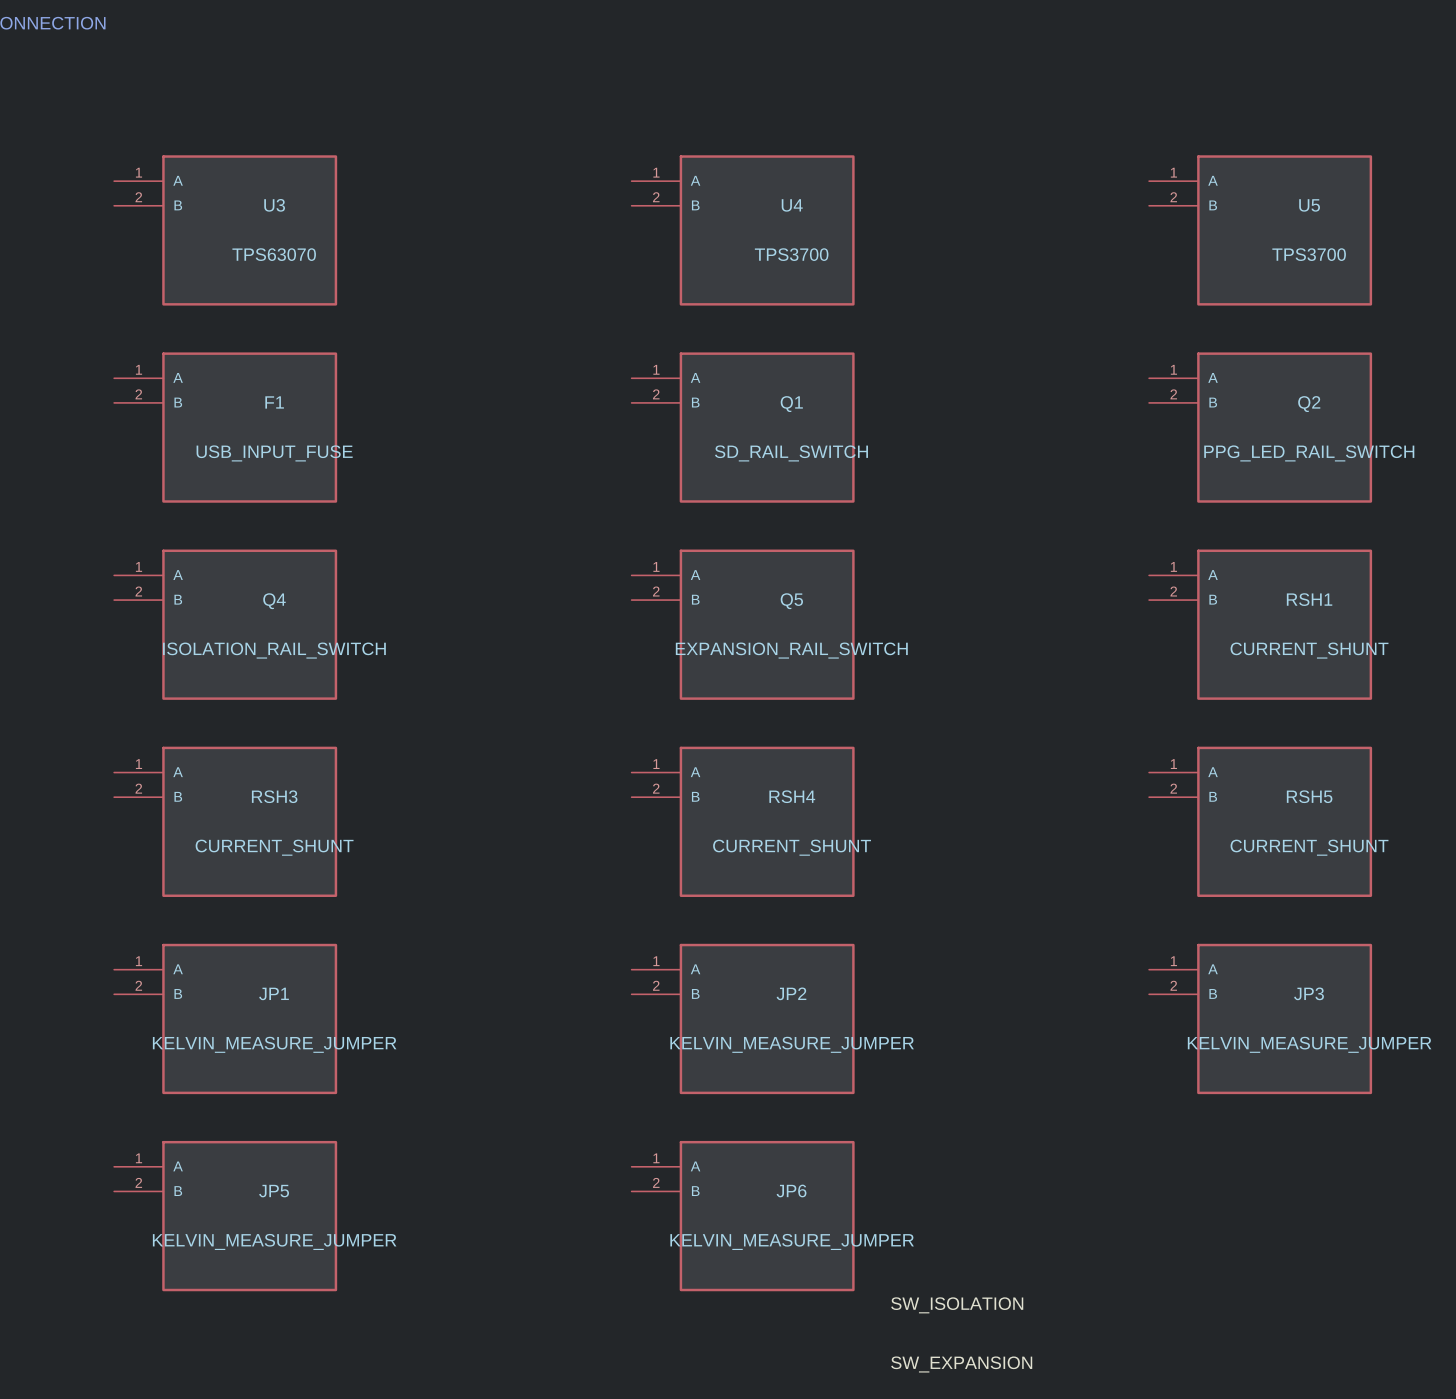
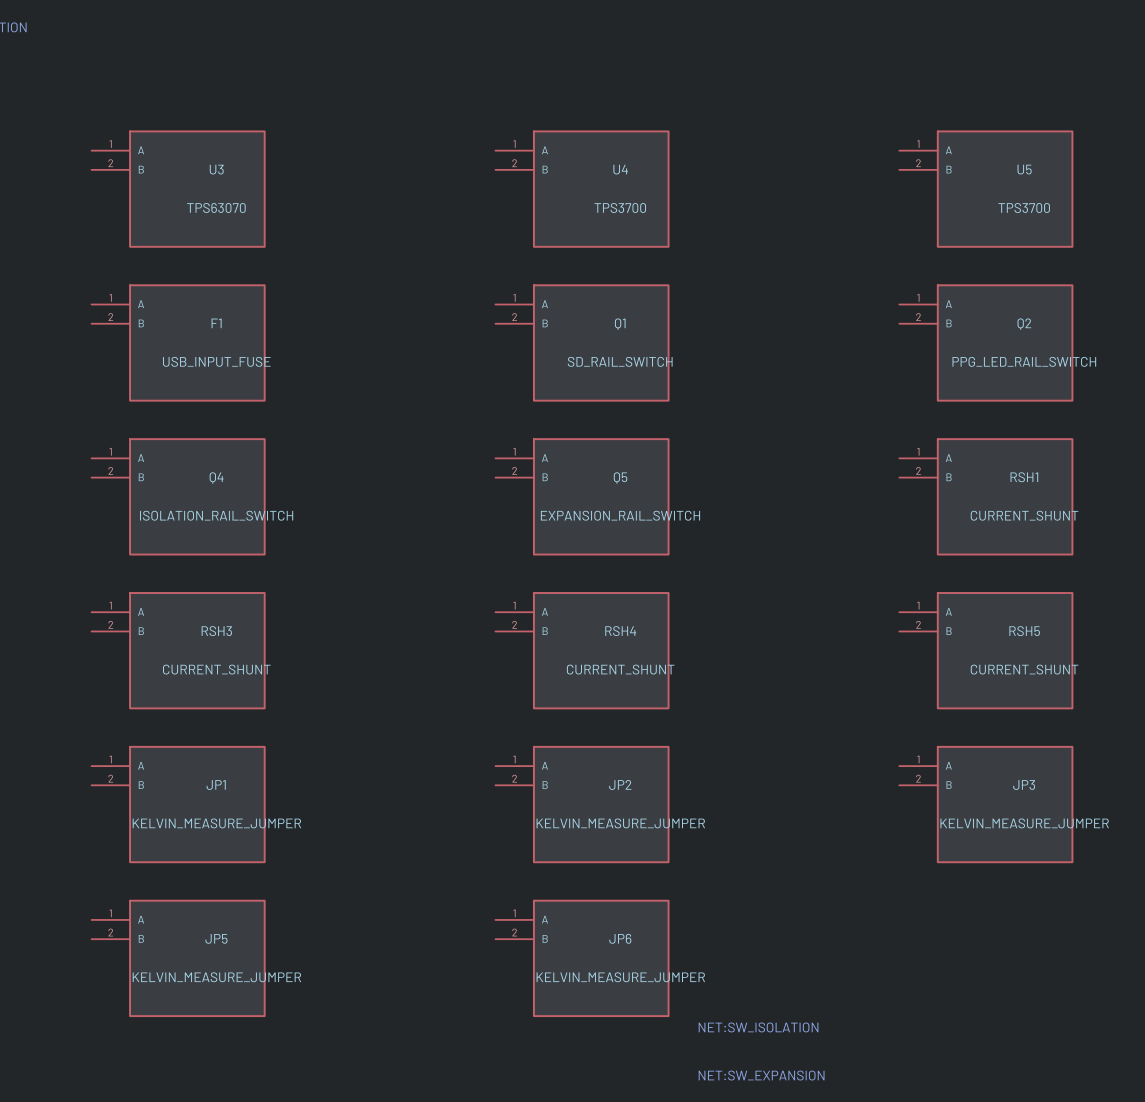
label: SW_ISOLATION (957, 1305) -> none
text: none -> NET:SW_ISOLATION (758, 1027)
label: SW_EXPANSION (961, 1364) -> none
text: none -> NET:SW_EXPANSION (761, 1075)

